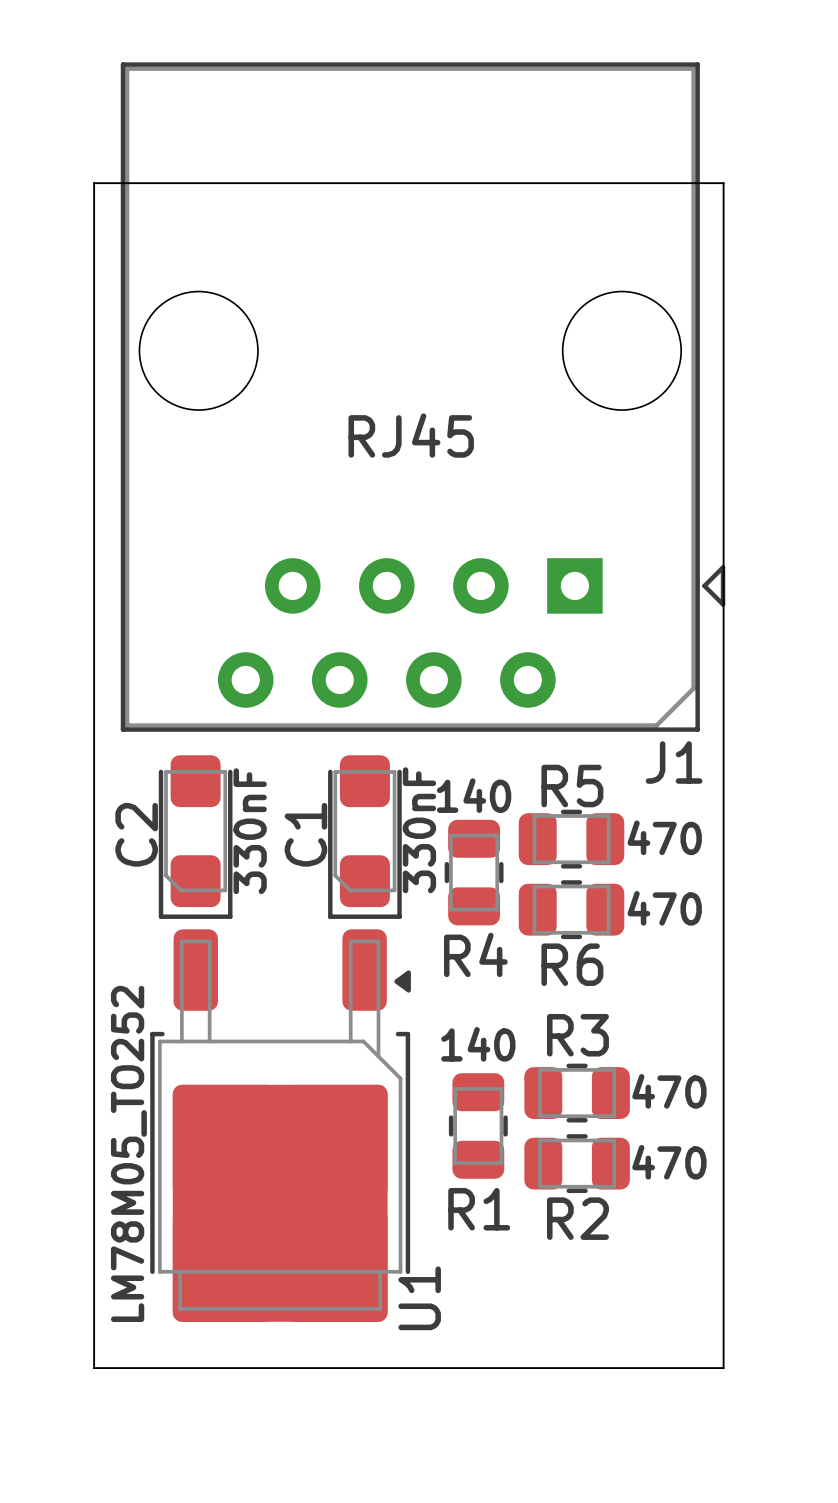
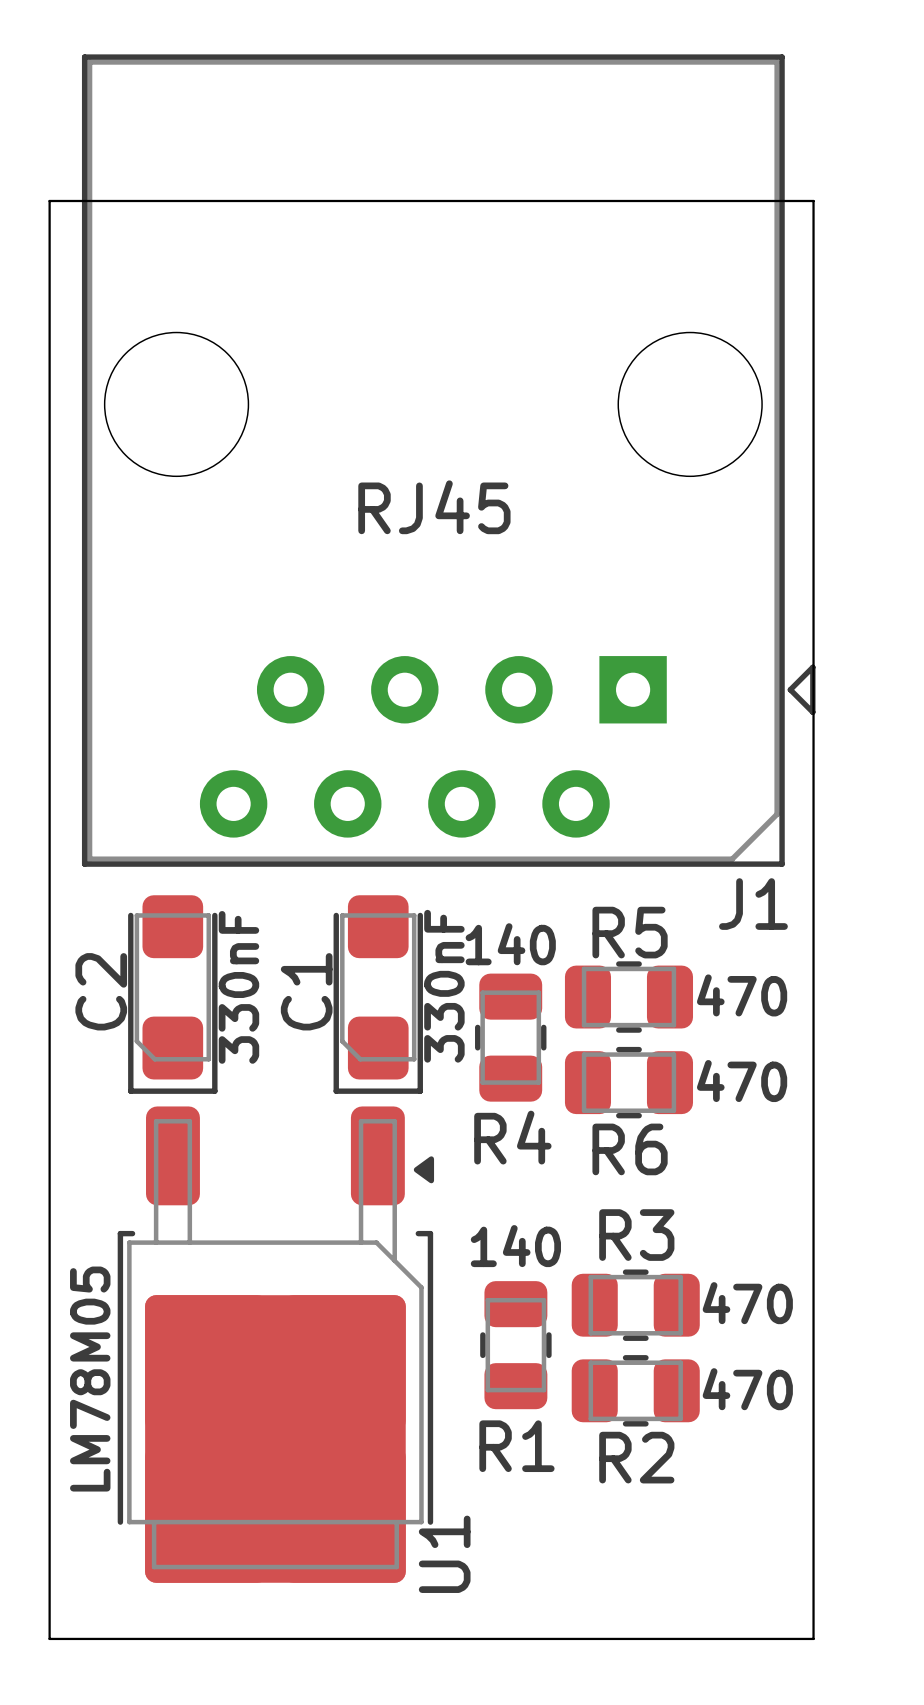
U1 value: LM78M05_TO252 (128, 1153) -> LM78M05 (90, 1379)

